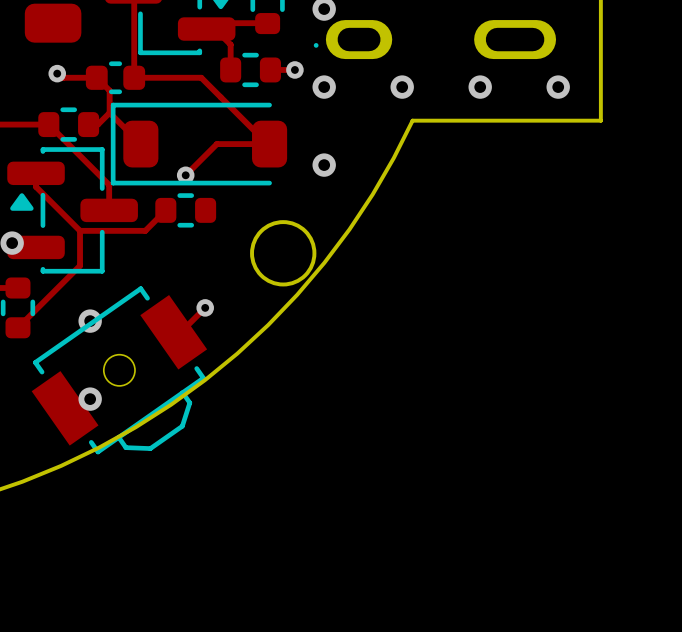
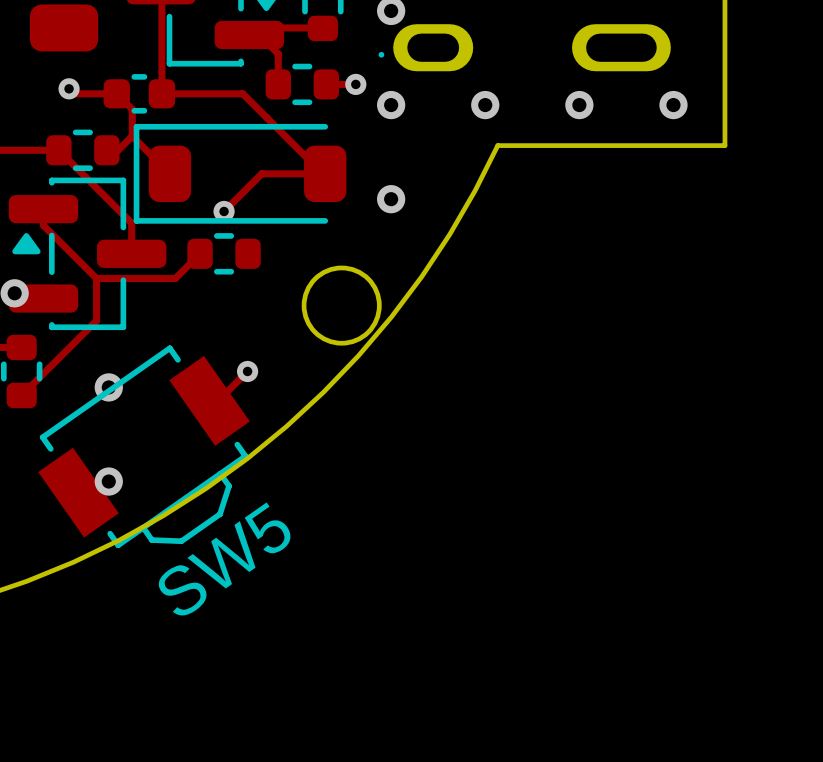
part: (119, 370) -> none
SW5: none -> (144, 446)

